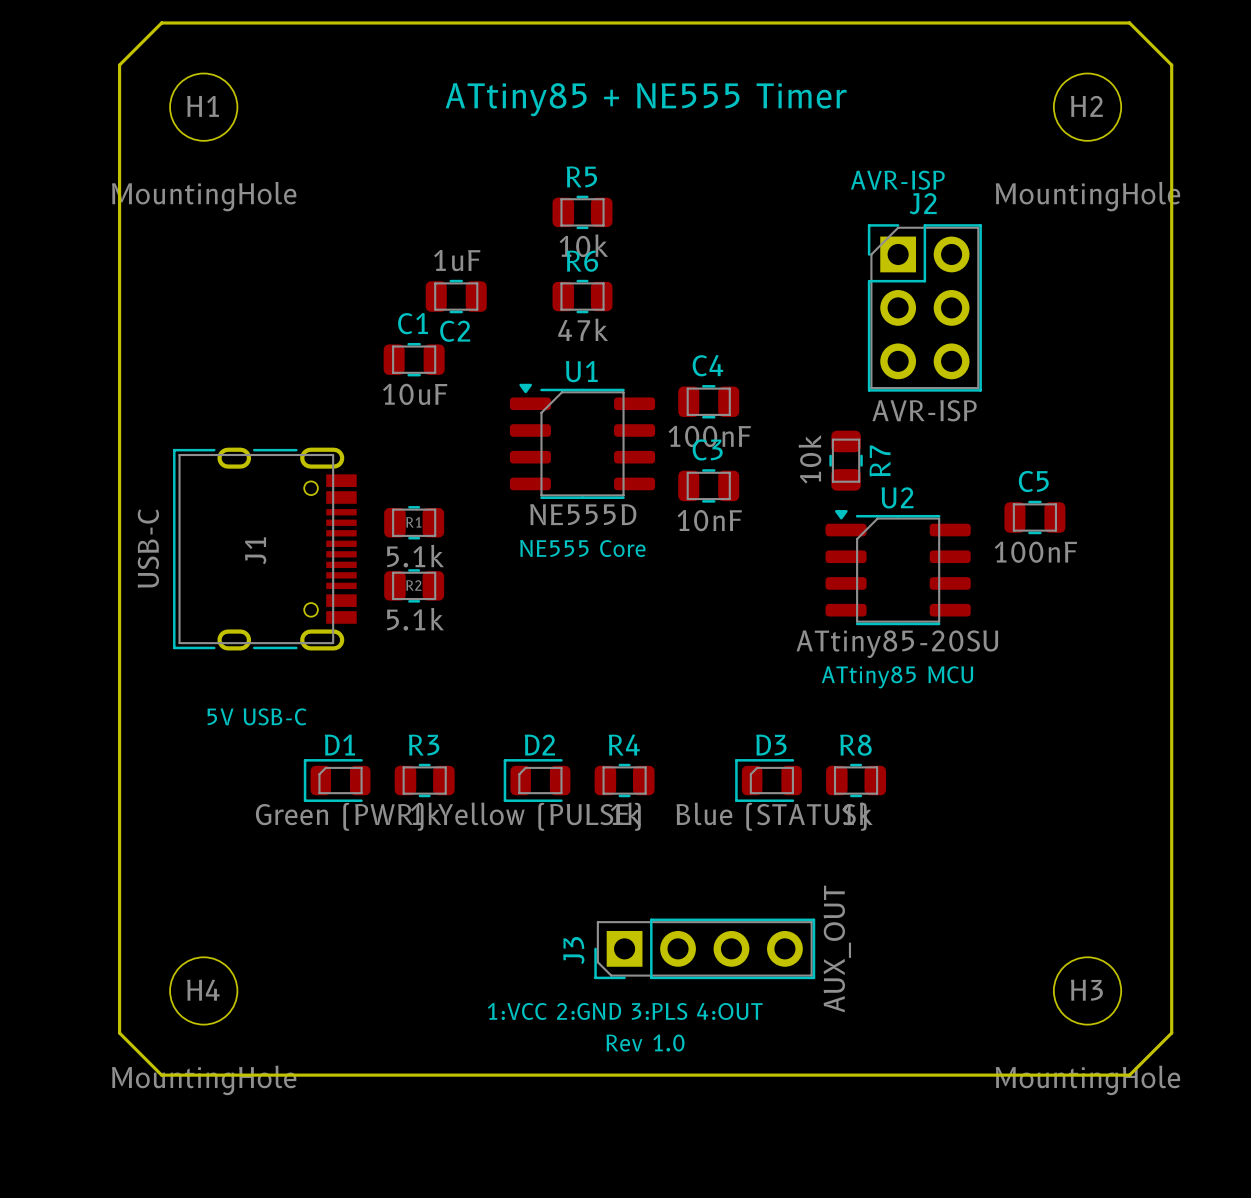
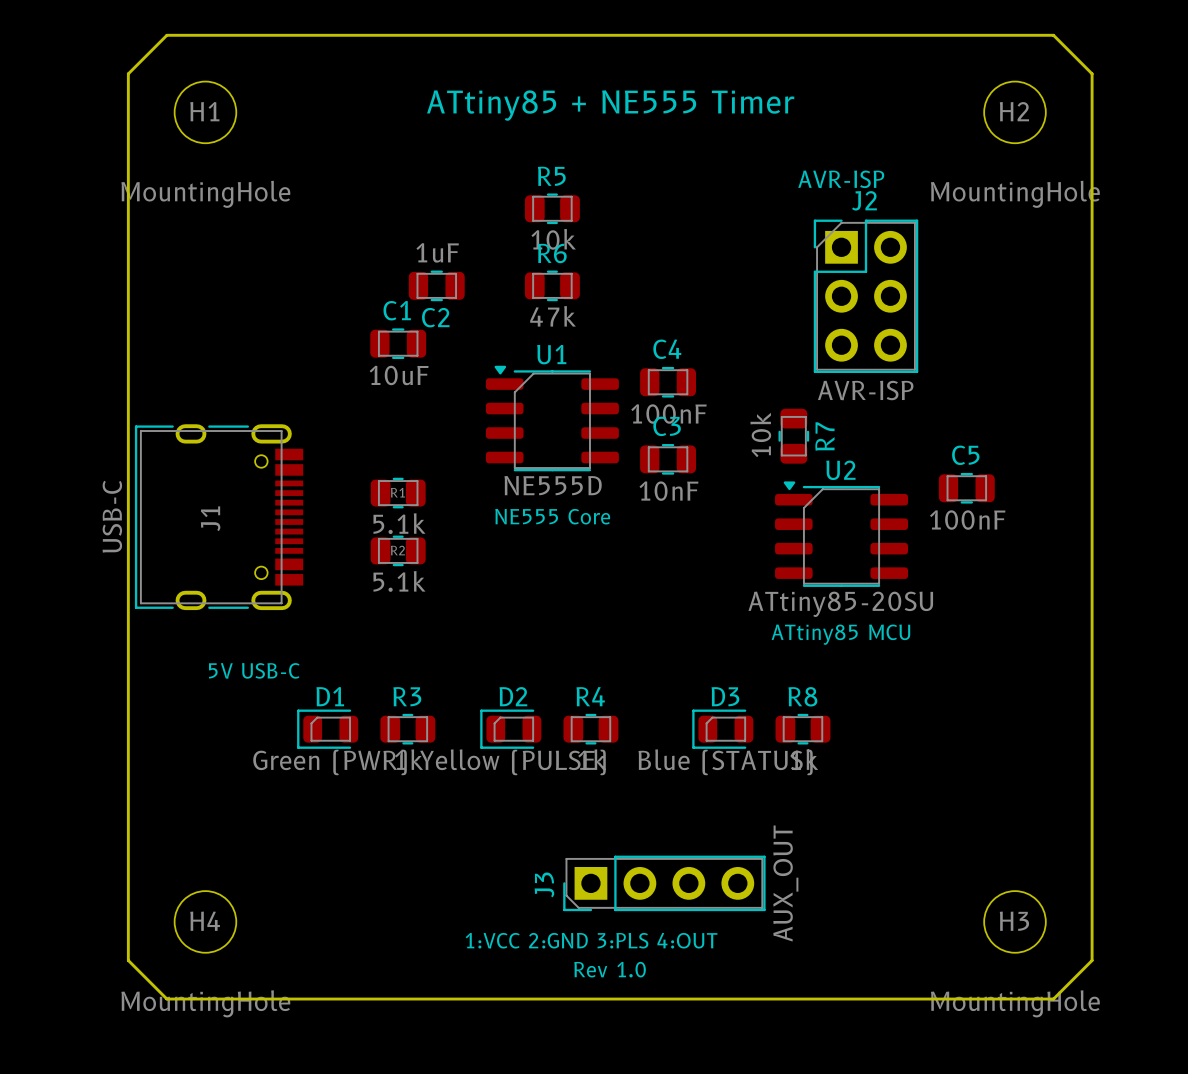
J1 position: (264, 549) -> (219, 517)

